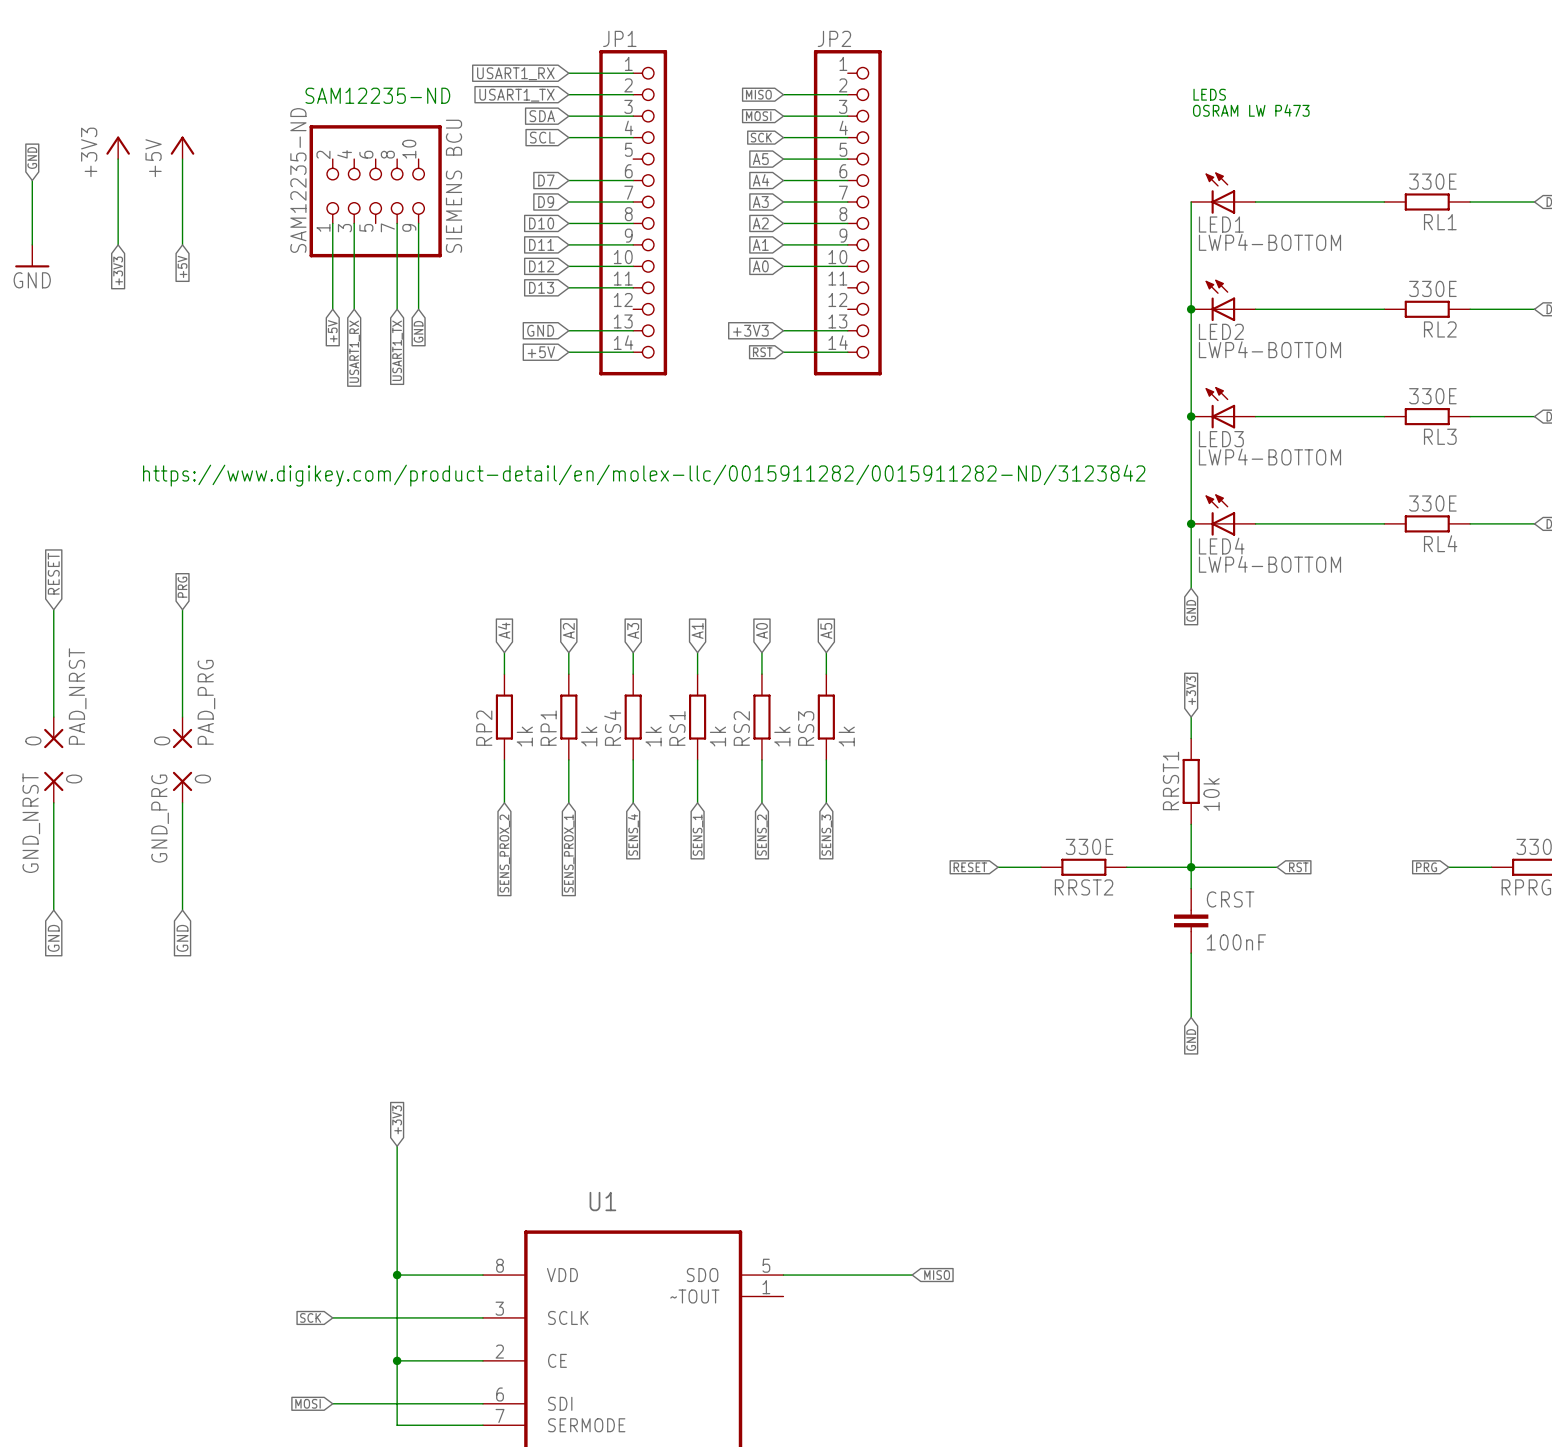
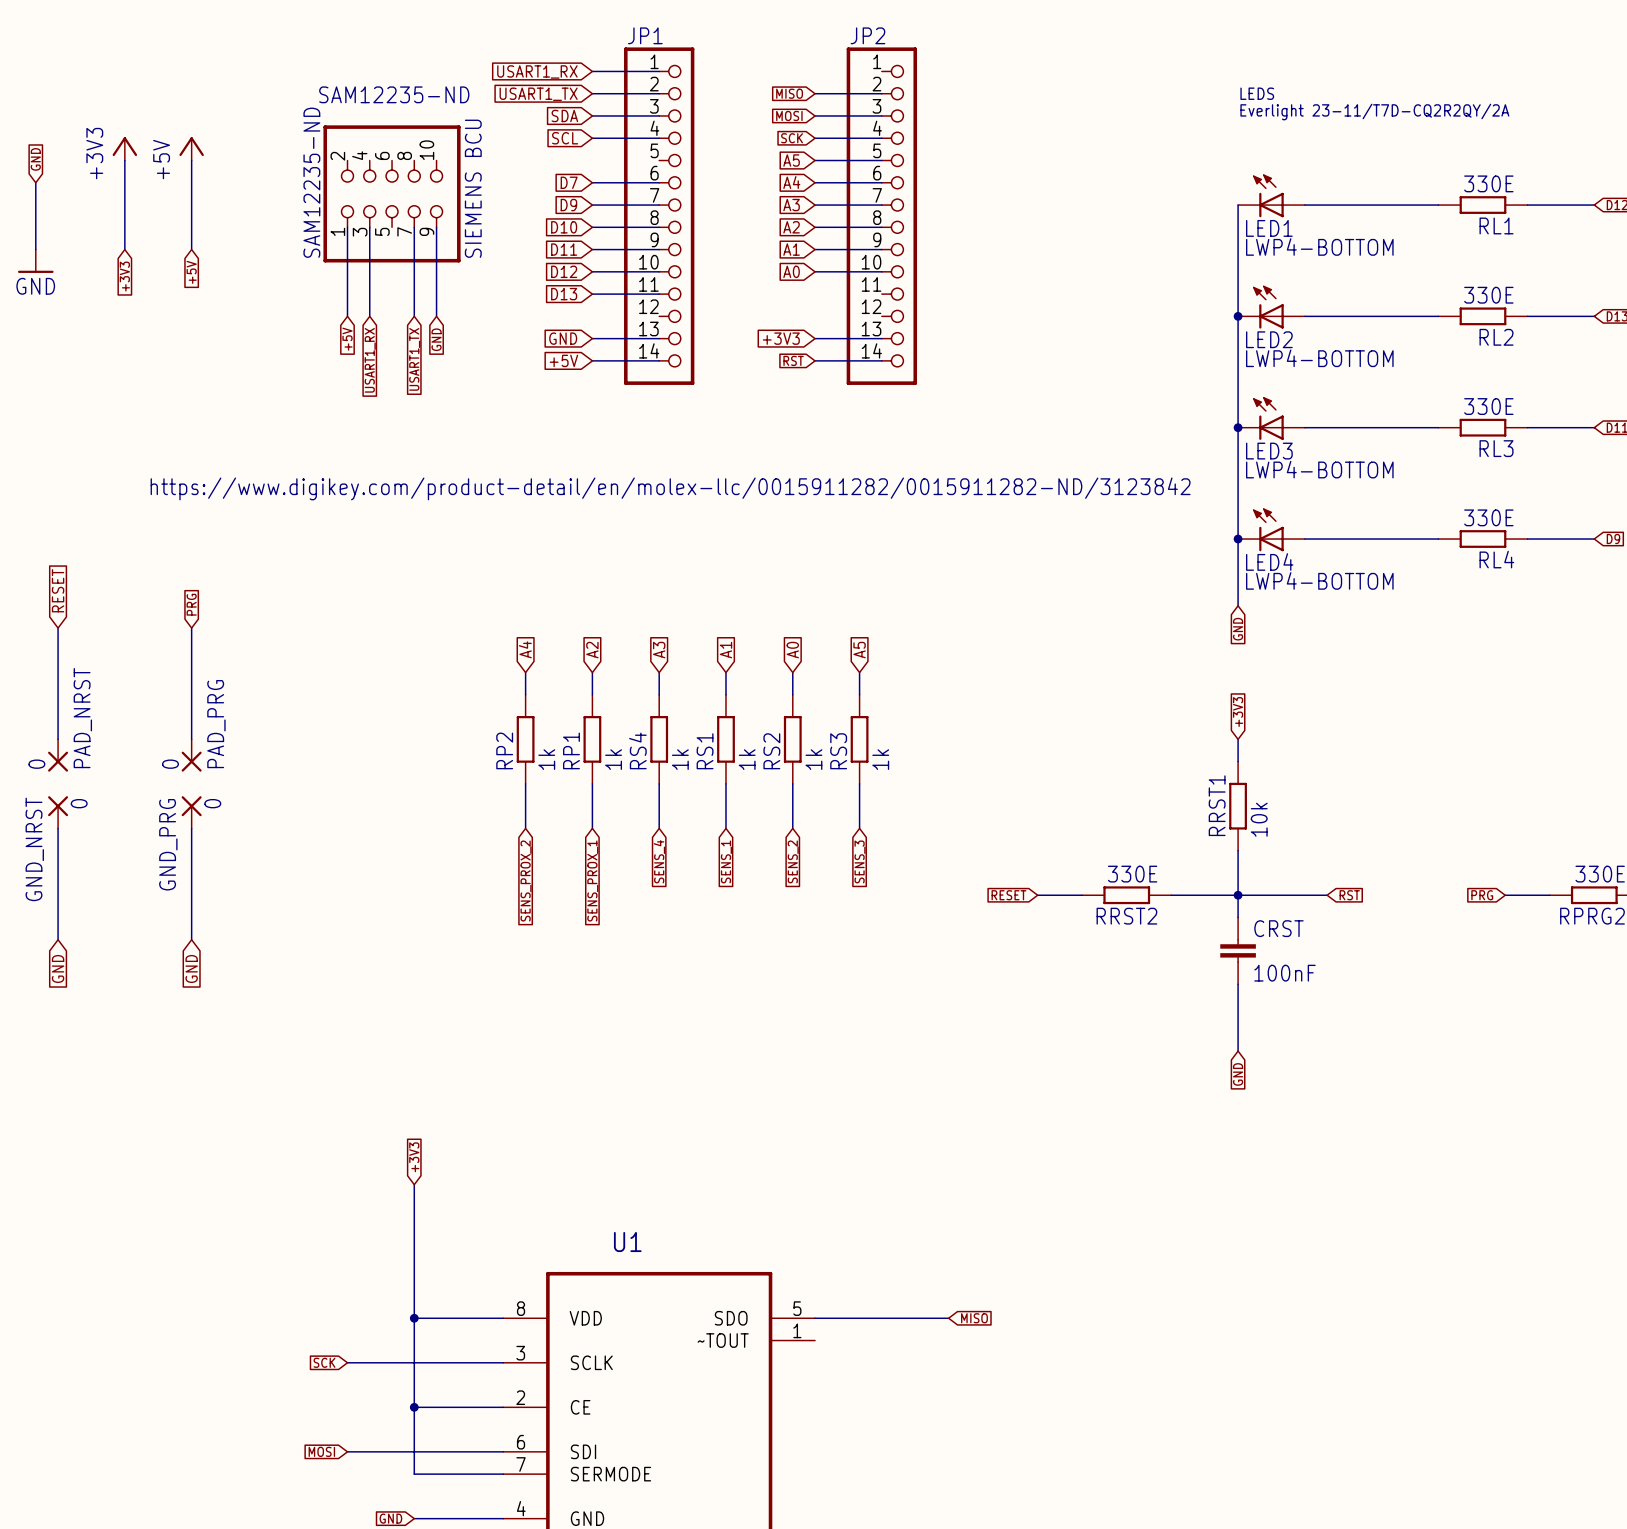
text: OSRAM LW P473 (1251, 110) -> Everlight 23-11/T7D-CQ2R2QY/2A (1374, 112)

